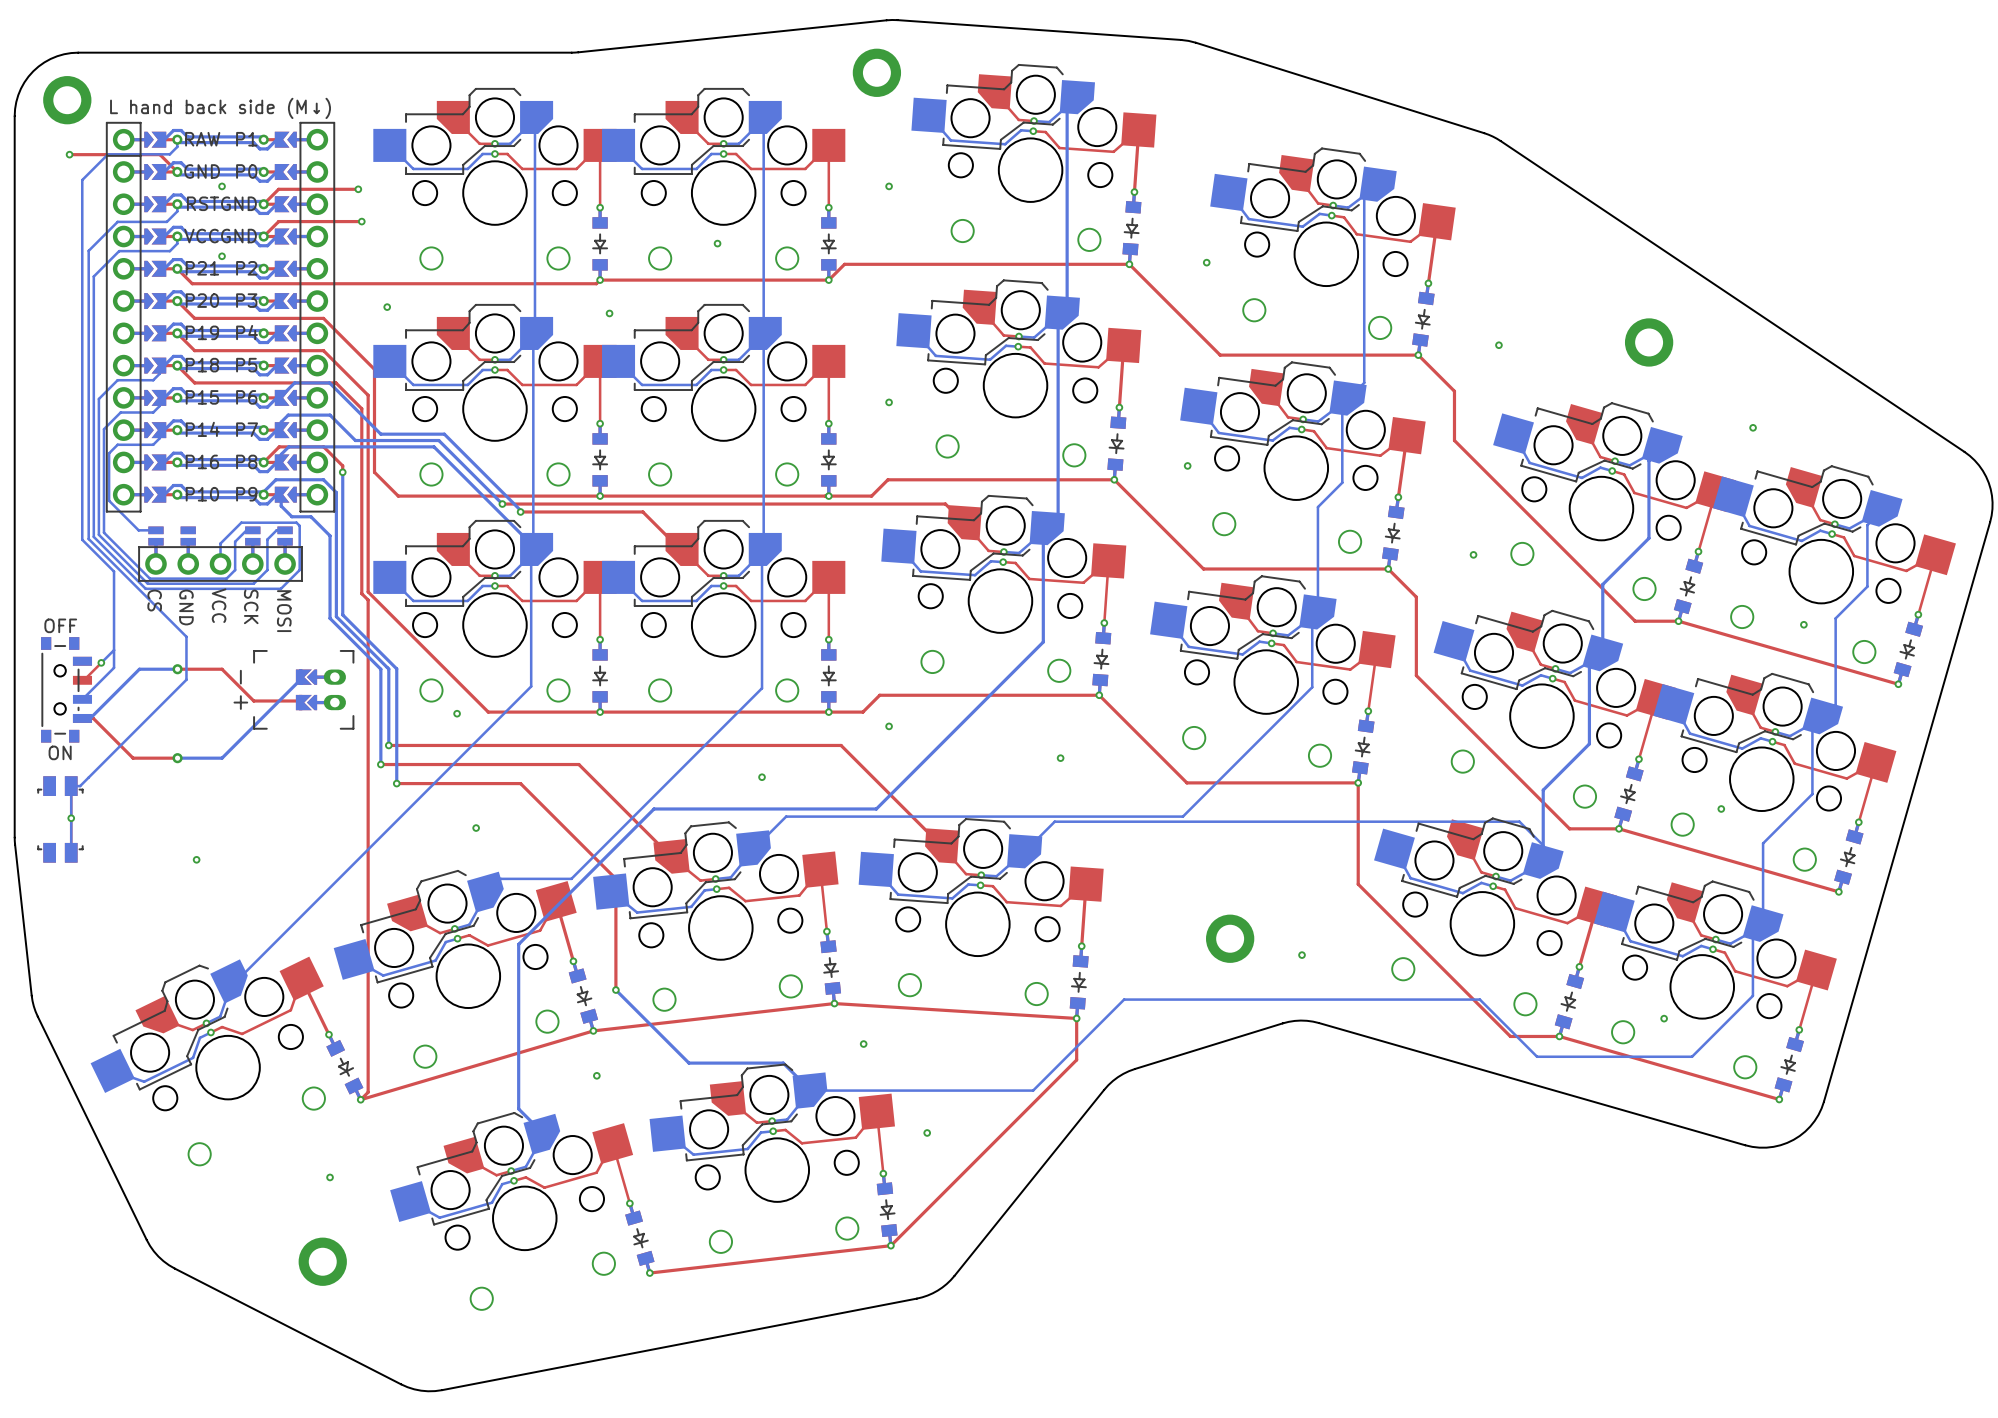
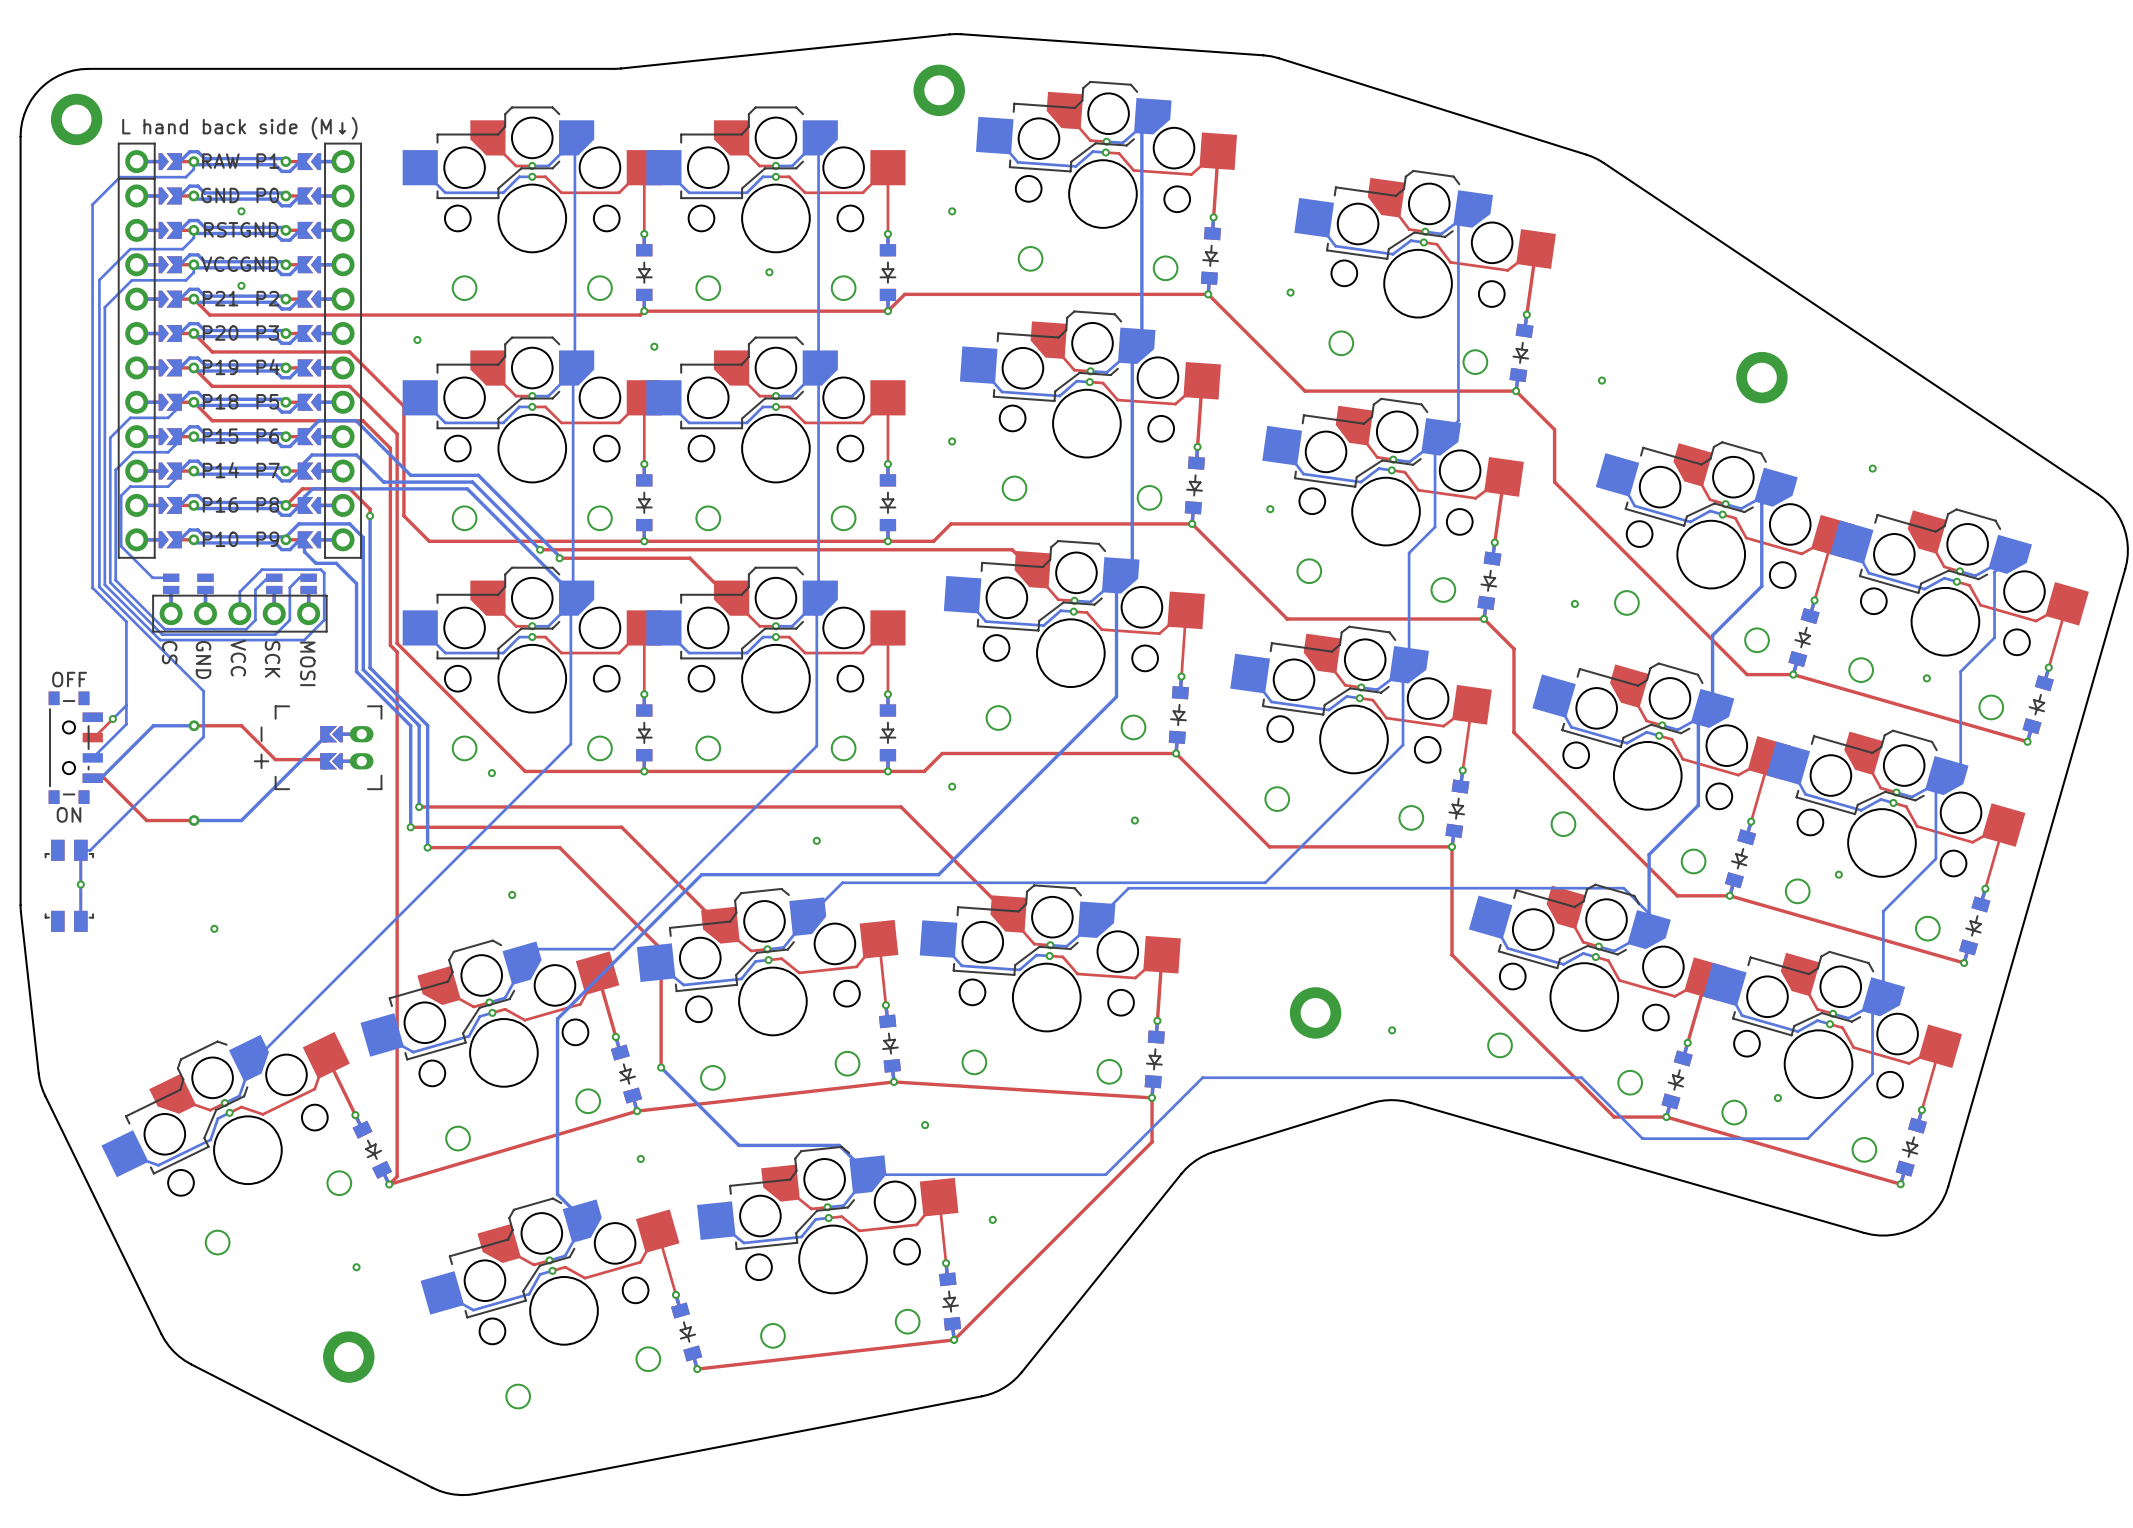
top track: (69, 154) (160, 154) (177, 171) -> none
via: (69, 154) -> none
top track: (358, 189) (278, 189) (263, 204) -> none
via: (358, 189) -> none
top track: (361, 221) (278, 221) (263, 236) -> none
via: (361, 221) -> none

